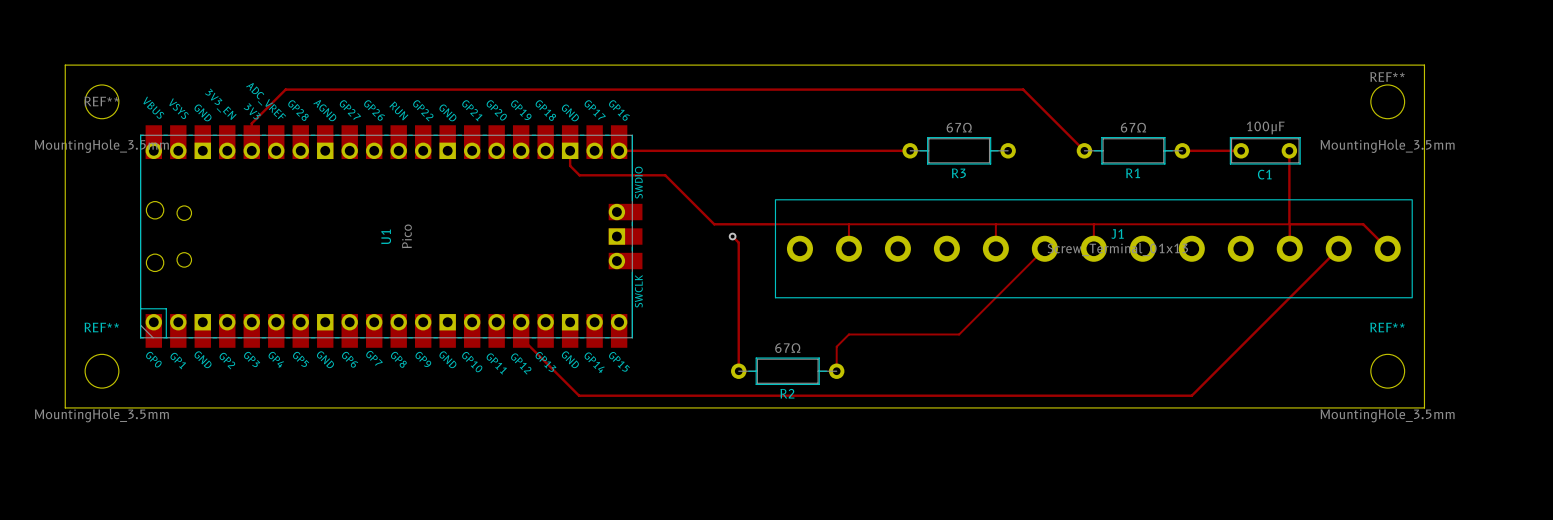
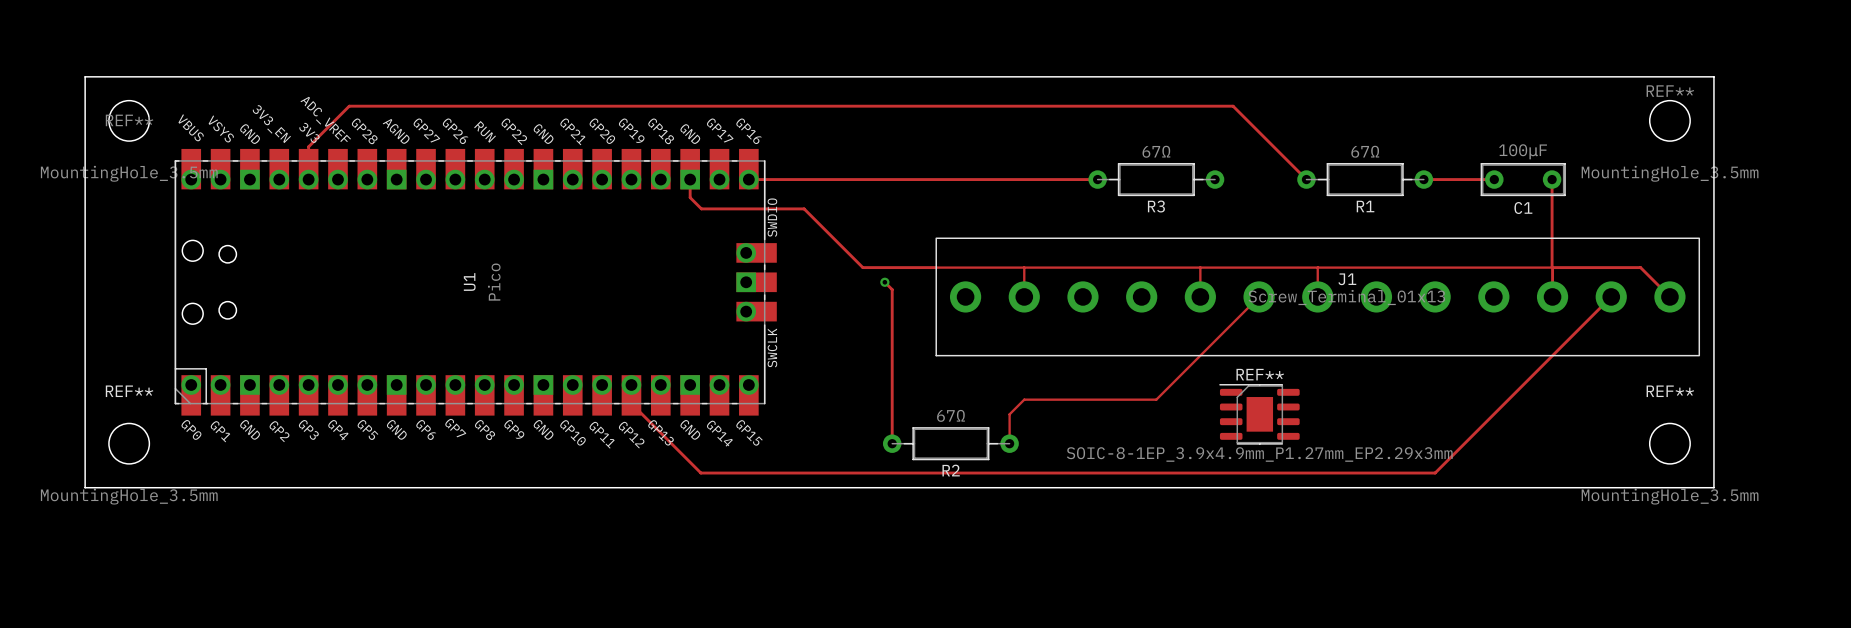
REF**: none -> SOIC-8-1EP_3.9x4.9mm_P1.27mm_EP2.29x3mm (1259, 414)

